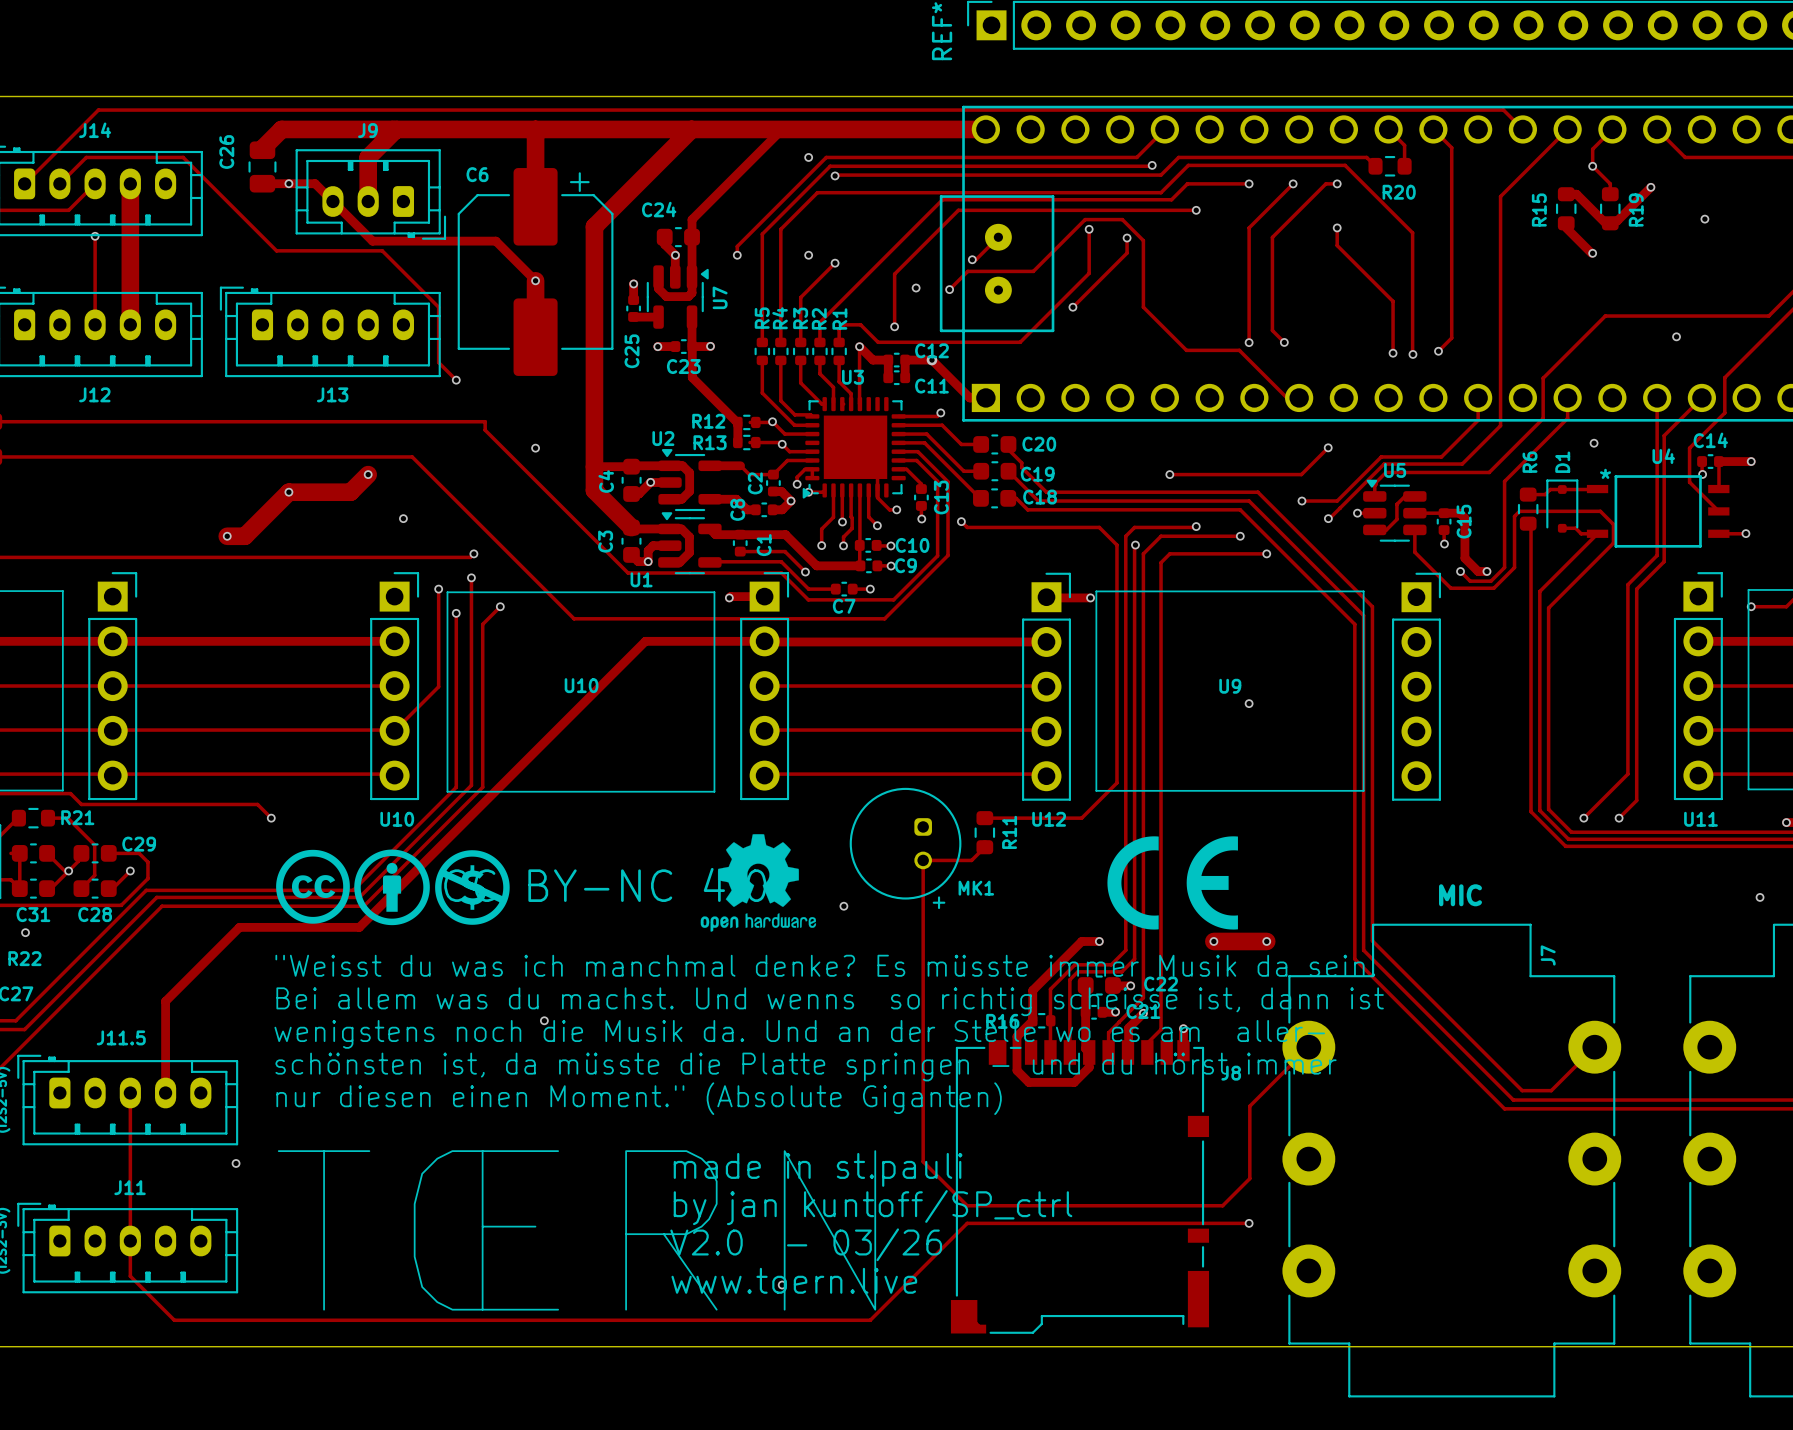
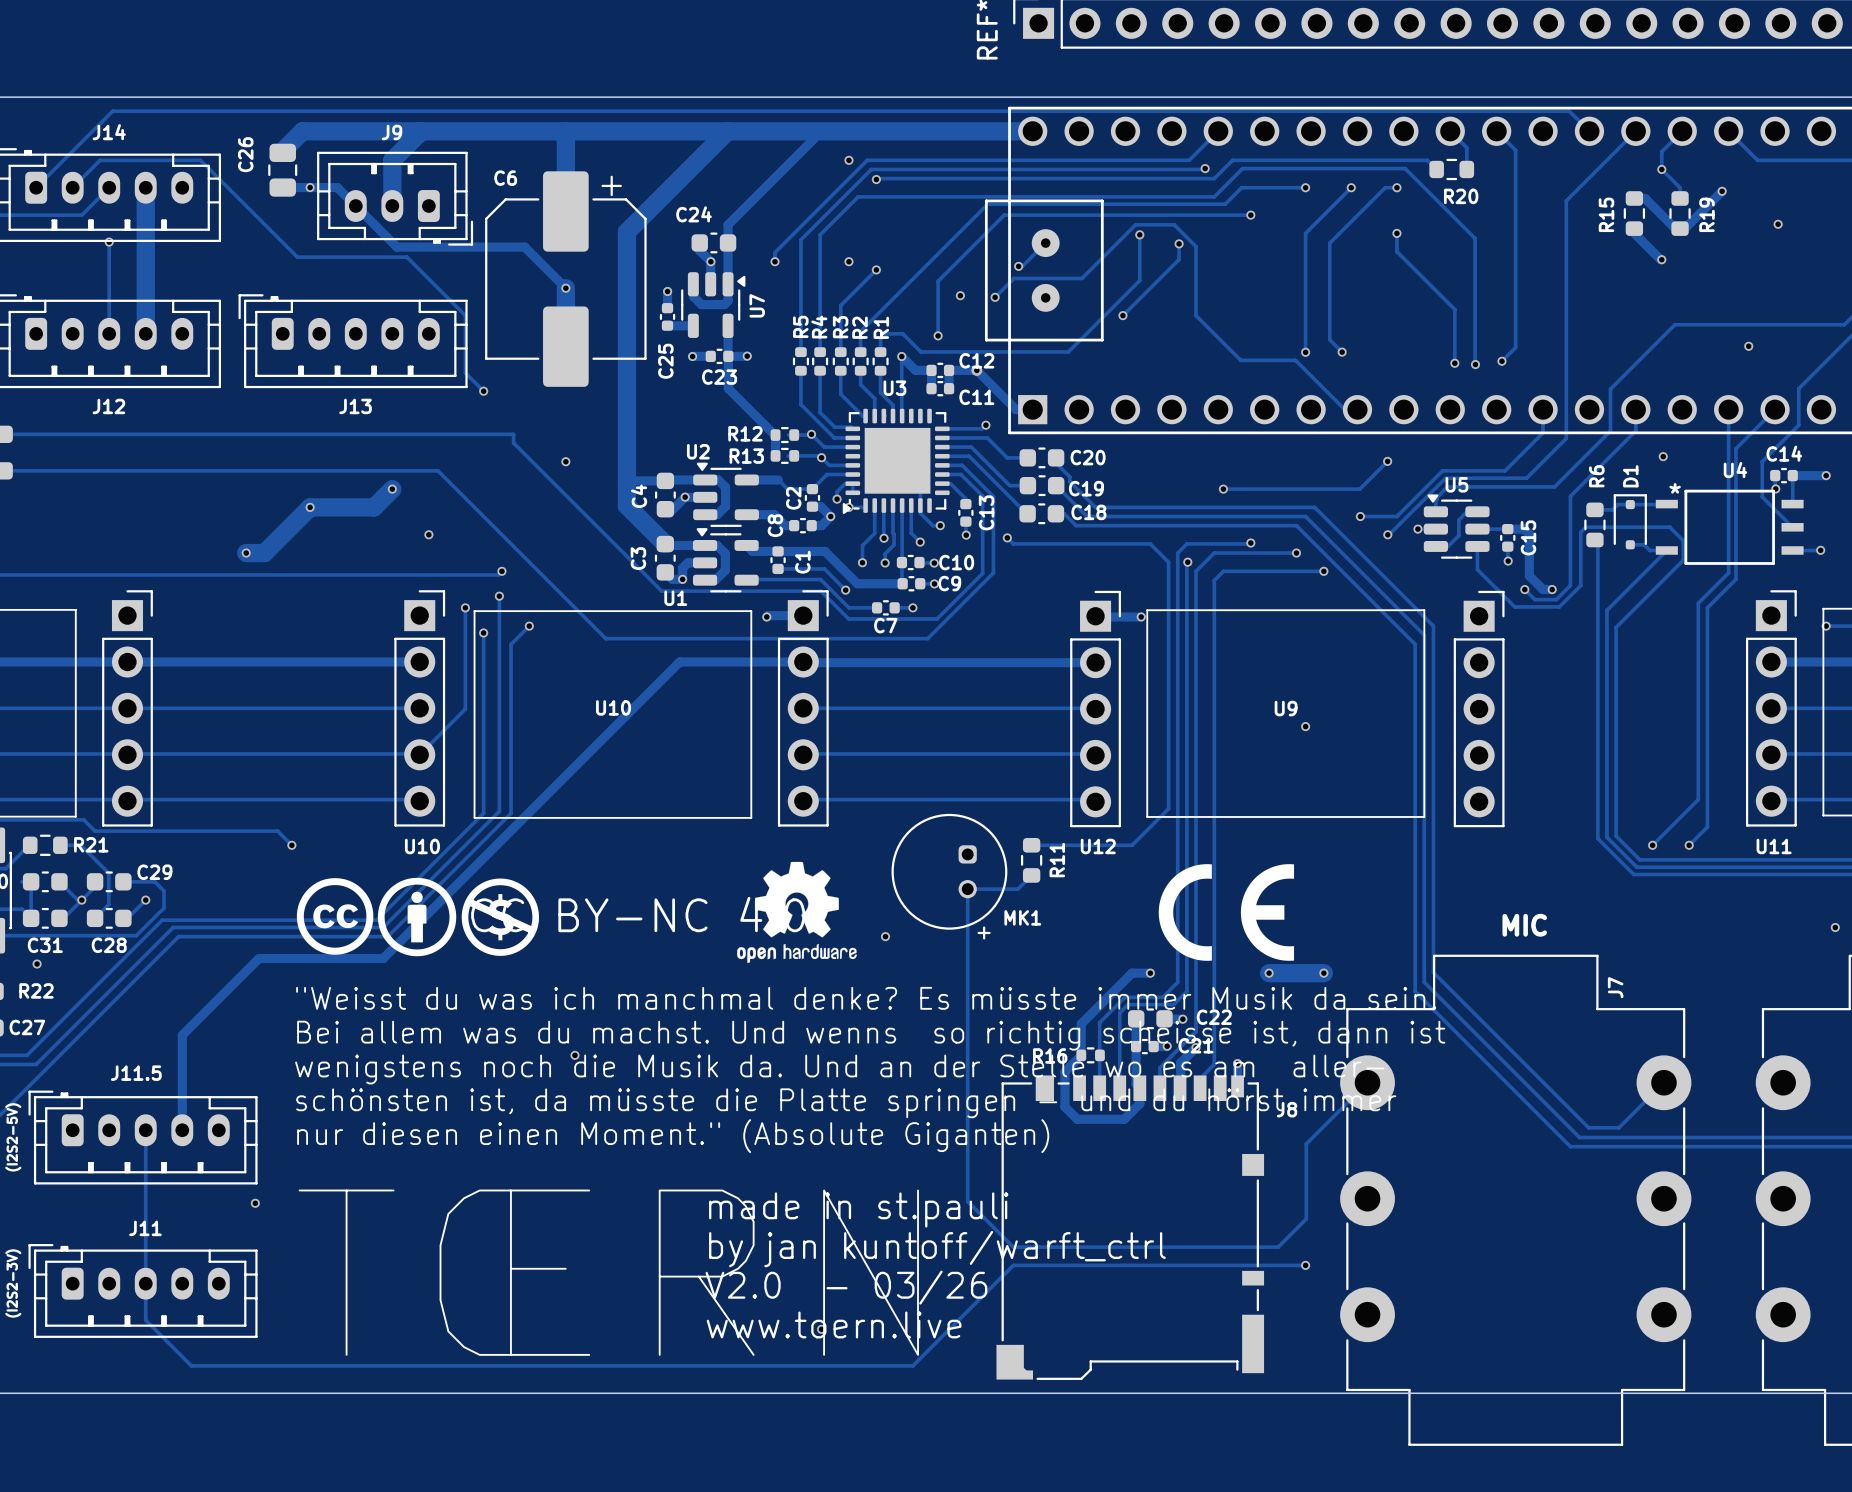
text: by jan kuntoff/SP_ctrl (873, 1207) -> by jan kuntoff/warft_ctrl (937, 1249)

